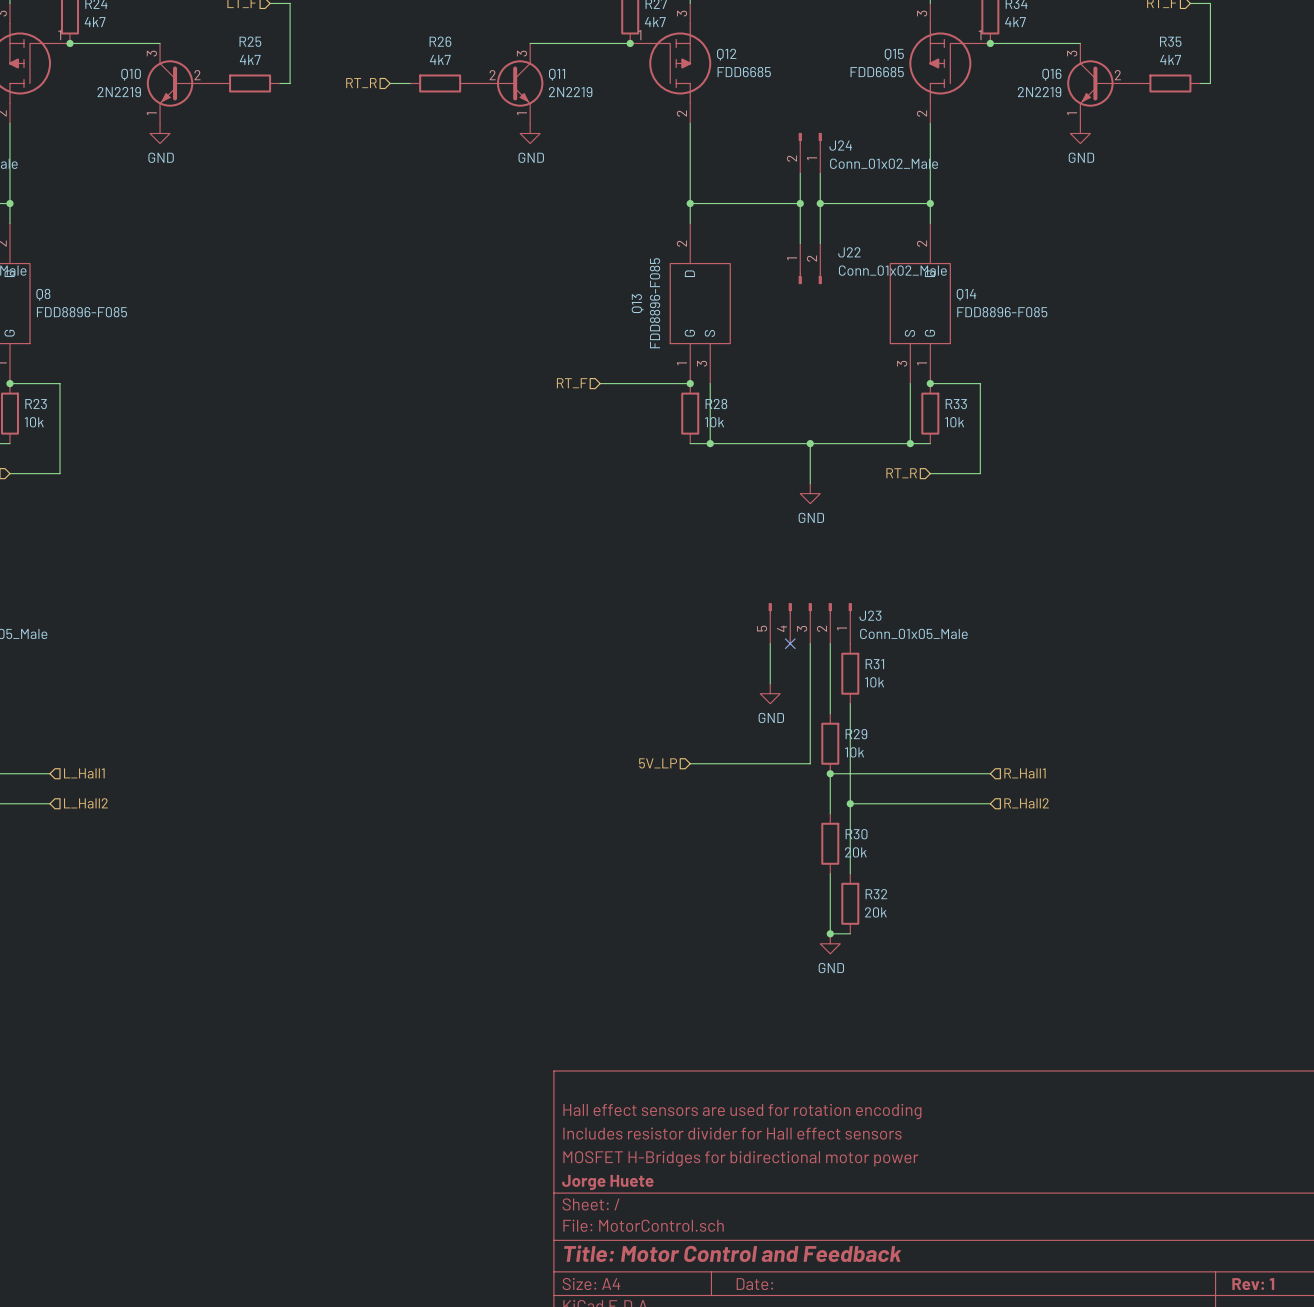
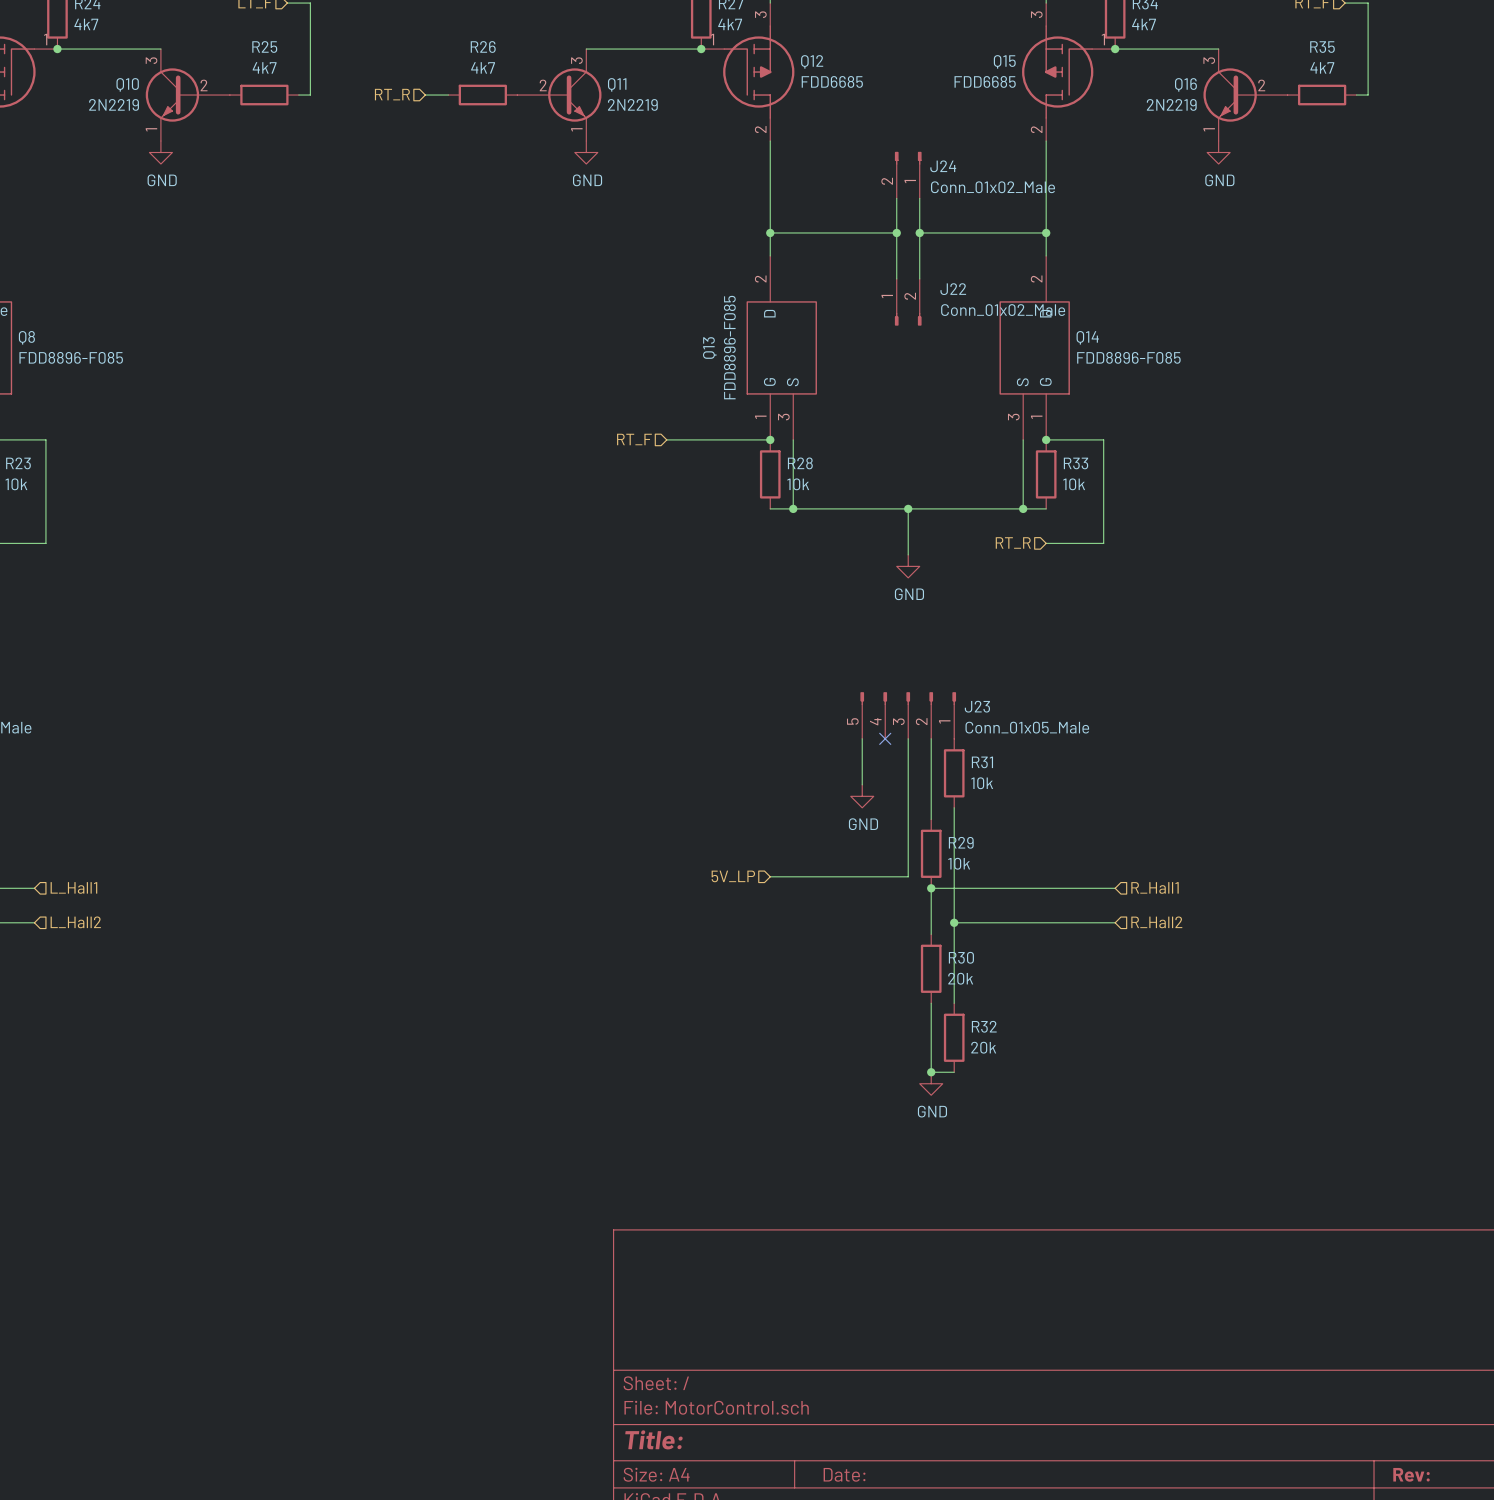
title block: Hall effect sensors are used for rotation encoding (742, 1111) -> none
title block: Includes resistor divider for Hall effect sensors (732, 1133) -> none
title block: MOSFET H-Bridges for bidirectional motor power (740, 1158) -> none
title block: Jorge Huete (607, 1182) -> none
title block: Title: Motor Control and Feedback (732, 1253) -> Title: (654, 1439)
title block: Rev: 1 (1253, 1284) -> Rev: (1411, 1474)

